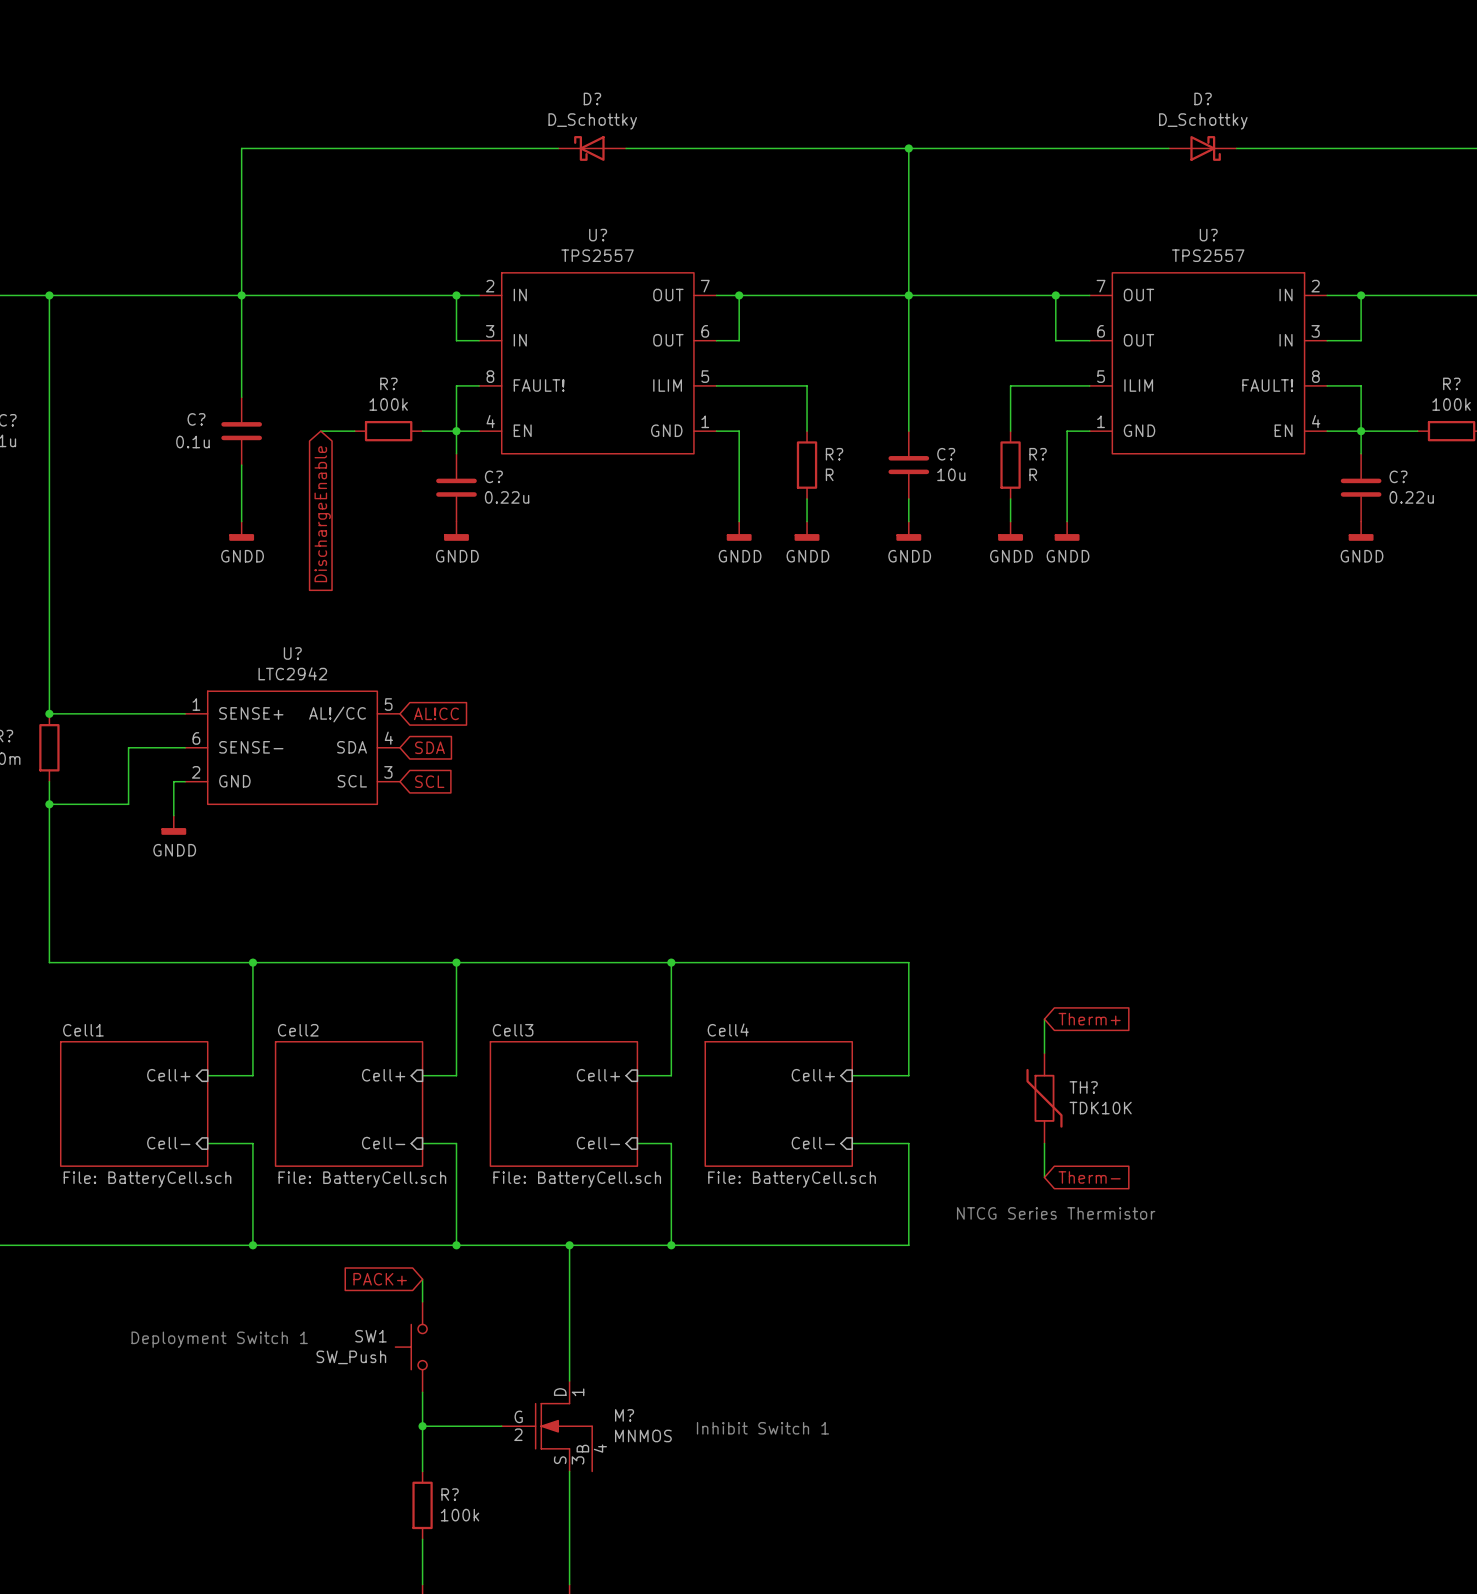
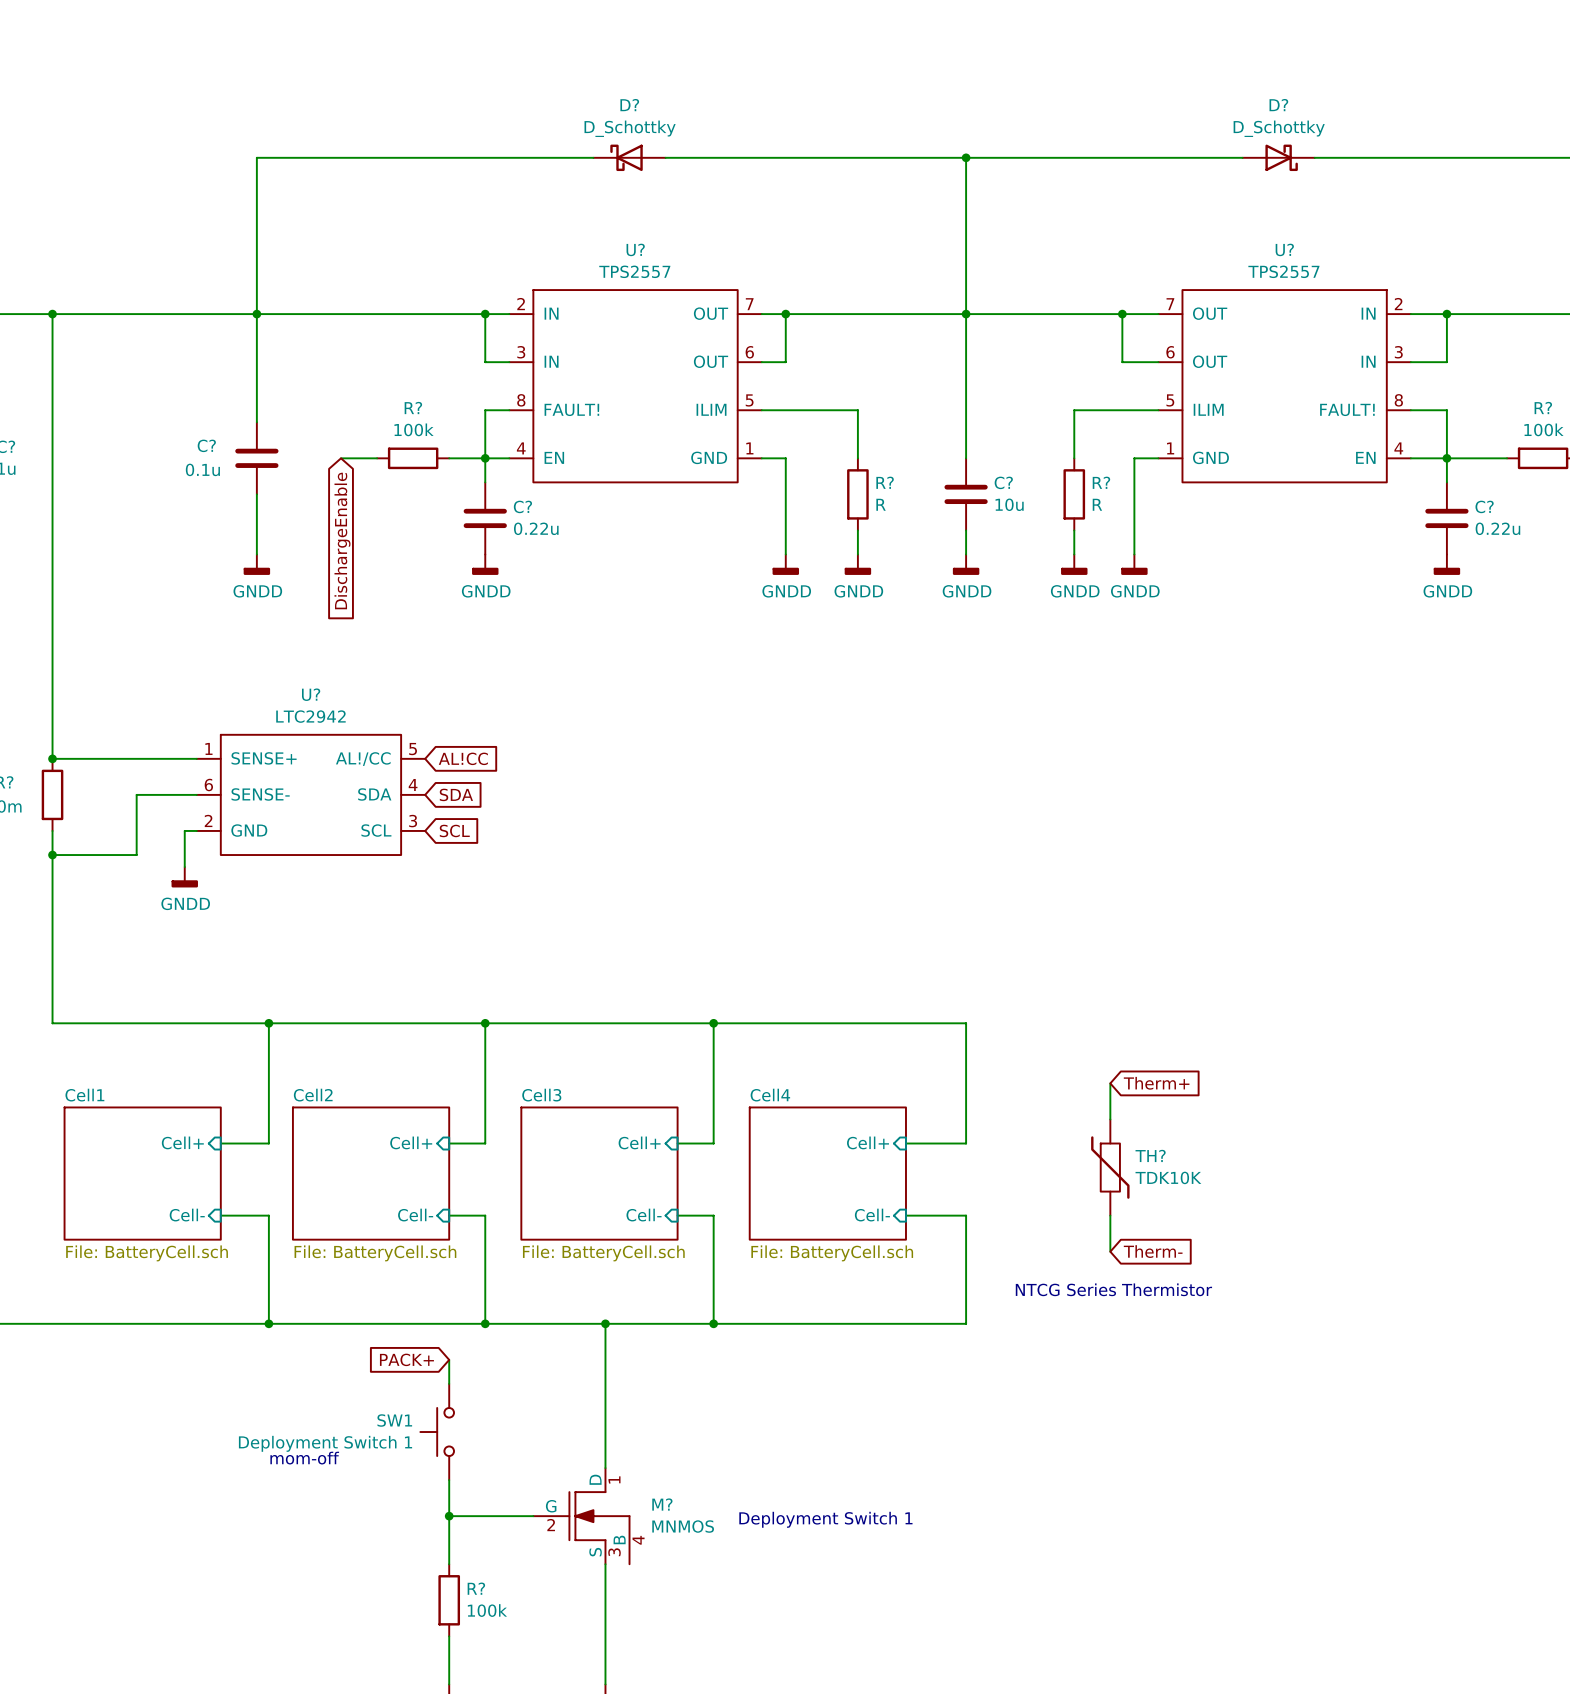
text: Deployment Switch 1 (219, 1339) -> none
SW1 value: SW_Push (351, 1357) -> Deployment Switch 1 (325, 1443)
text: none -> mom-off (304, 1458)
text: Inhibit Switch 1 (762, 1428) -> Deployment Switch 1 (825, 1519)

